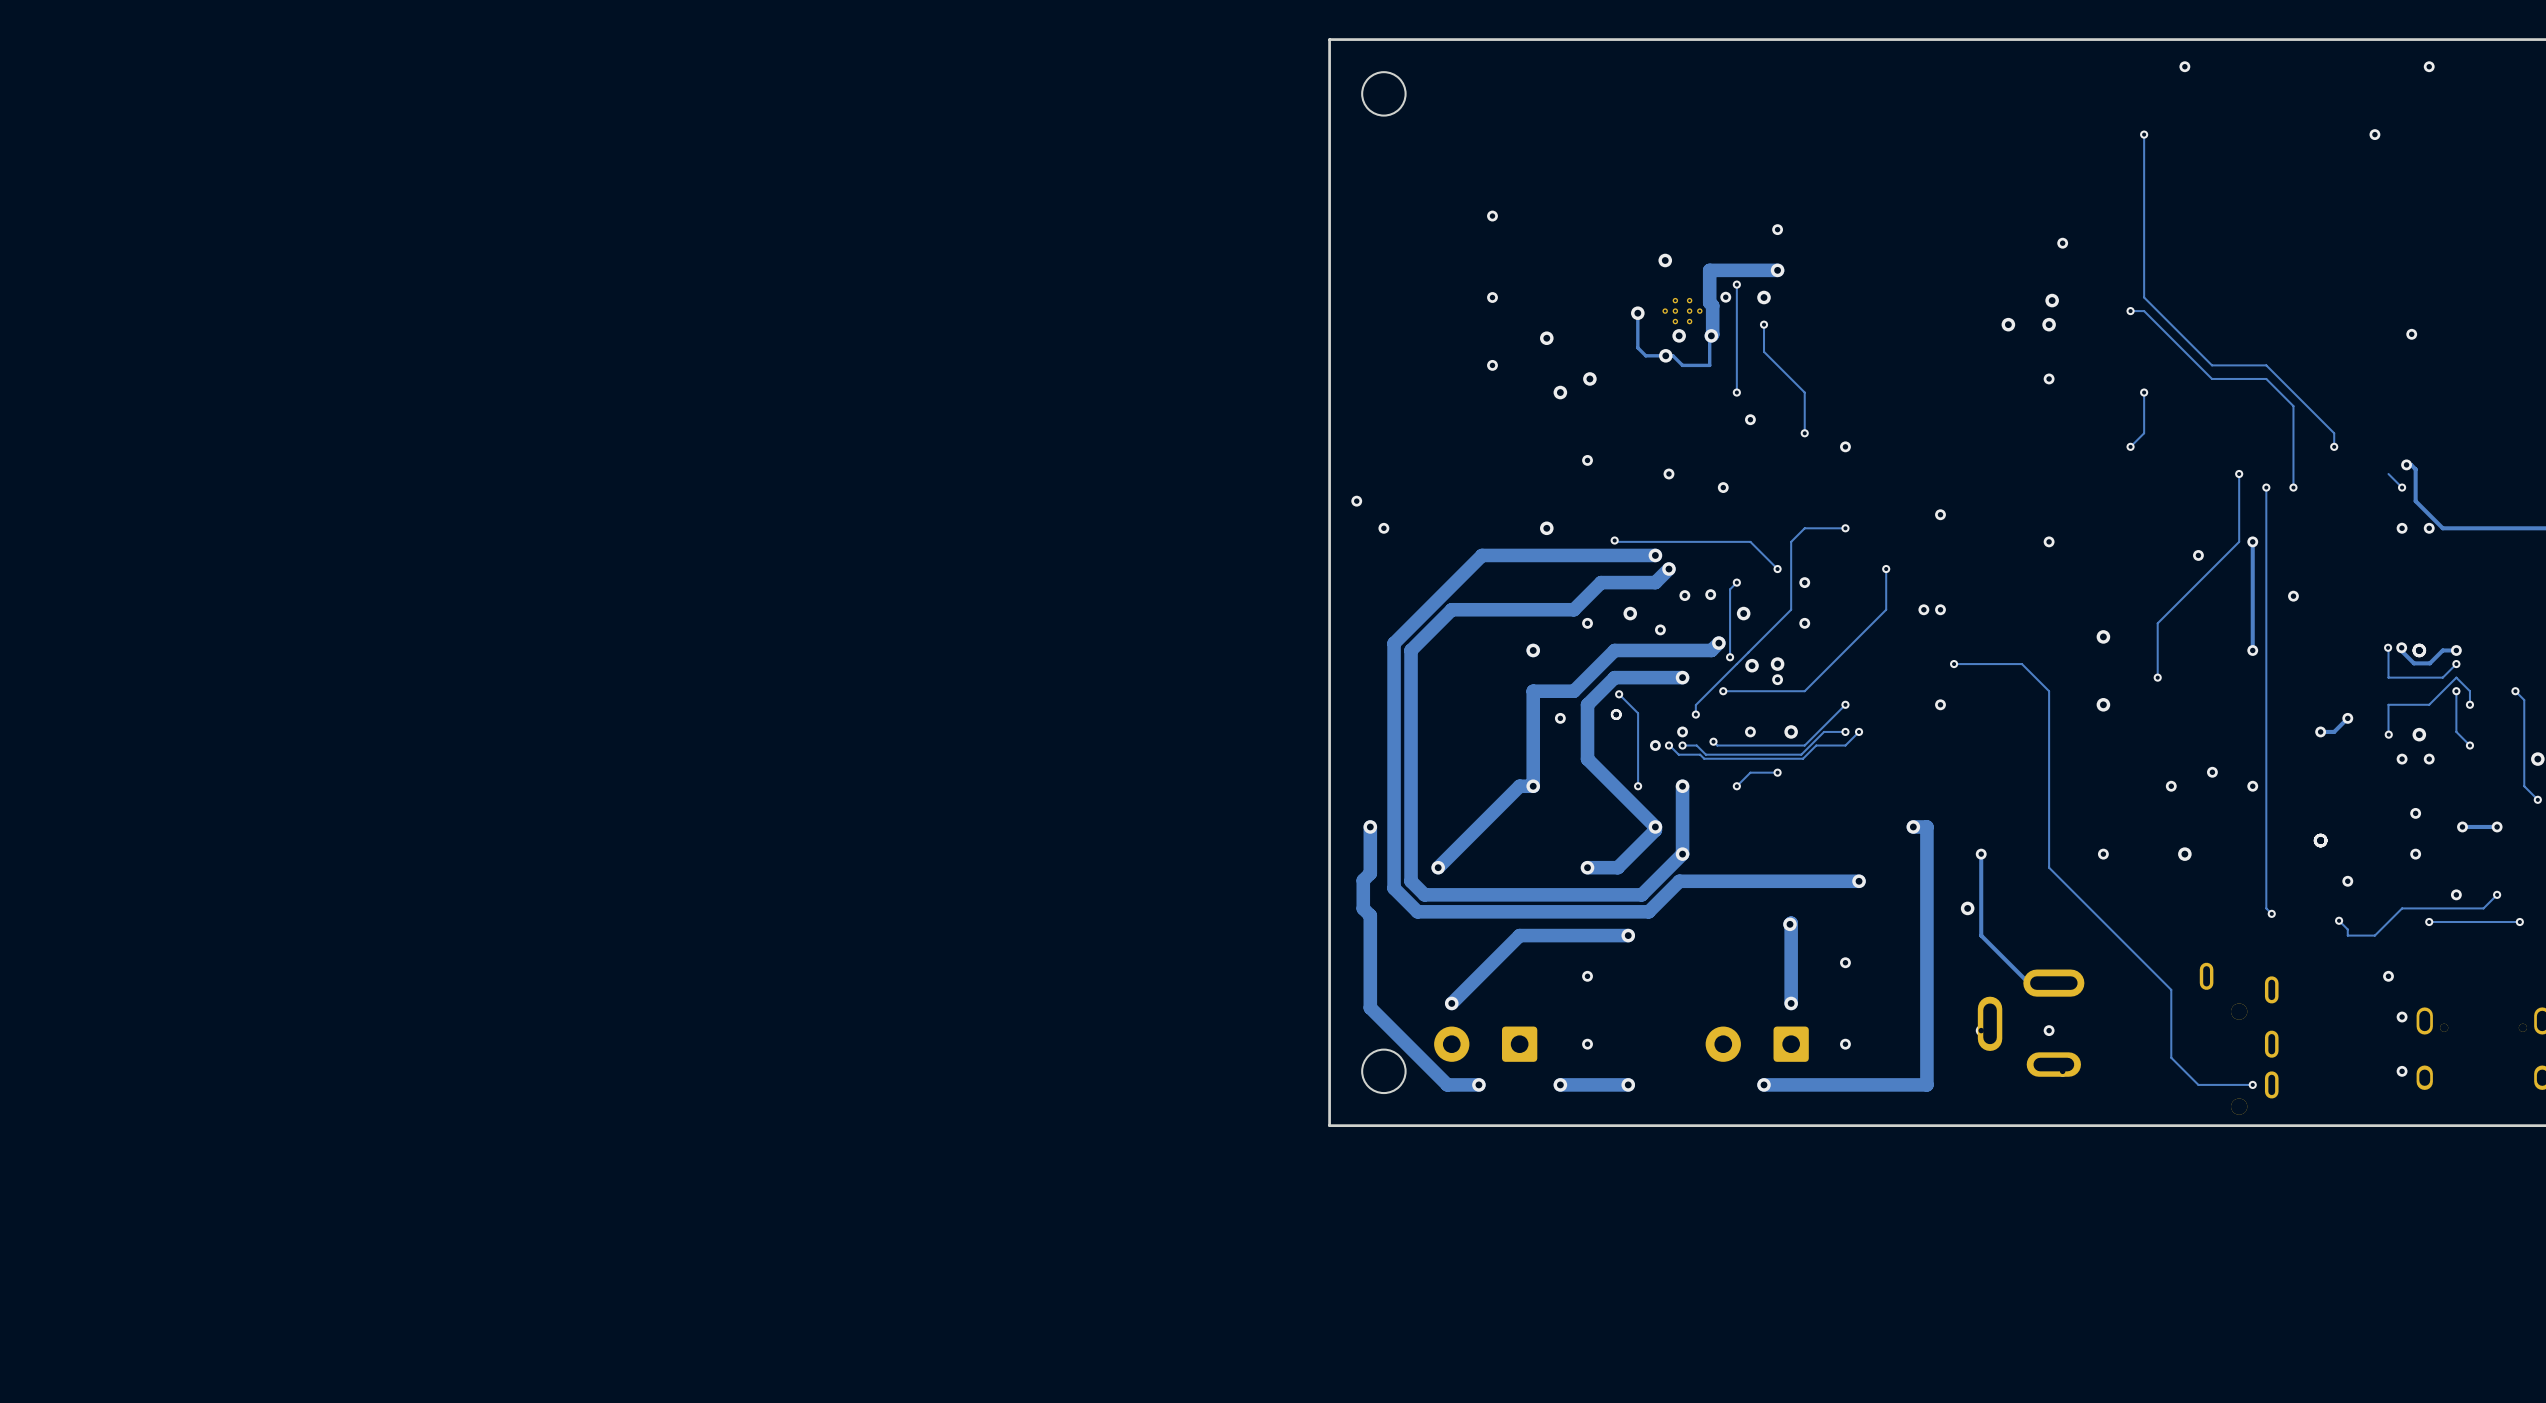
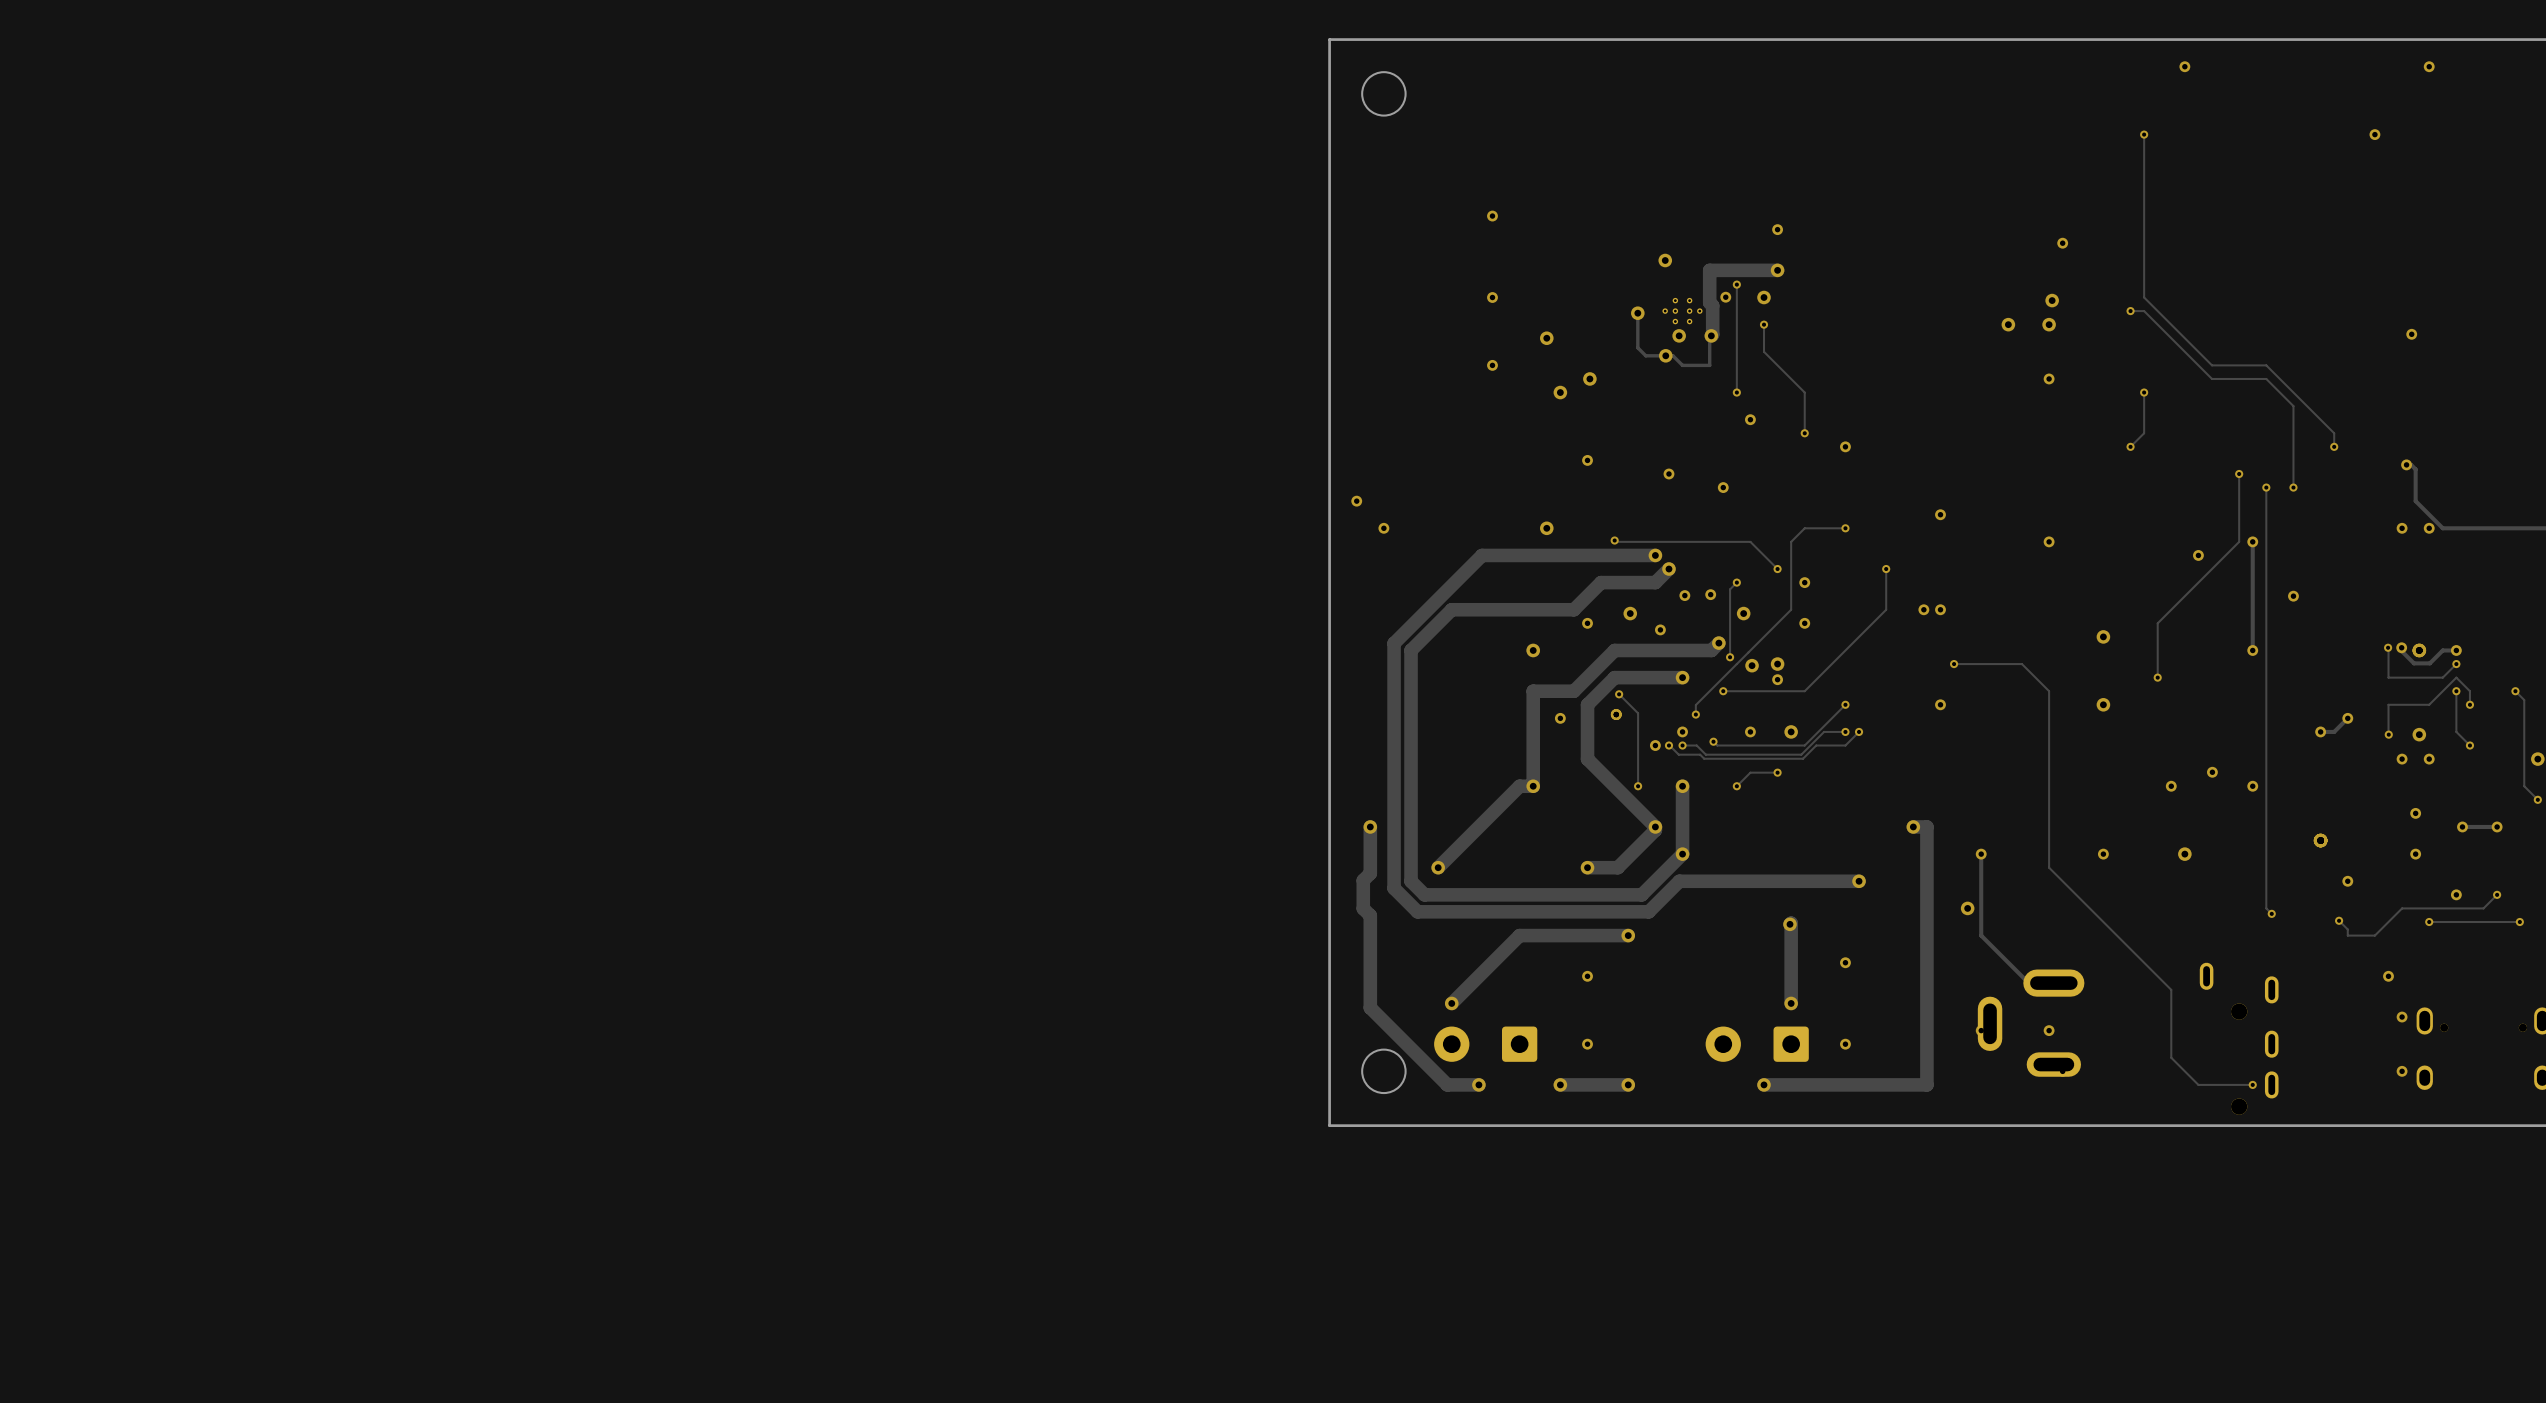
track: (2388, 473) (2402, 487) -> none
via: (2402, 487) -> none

